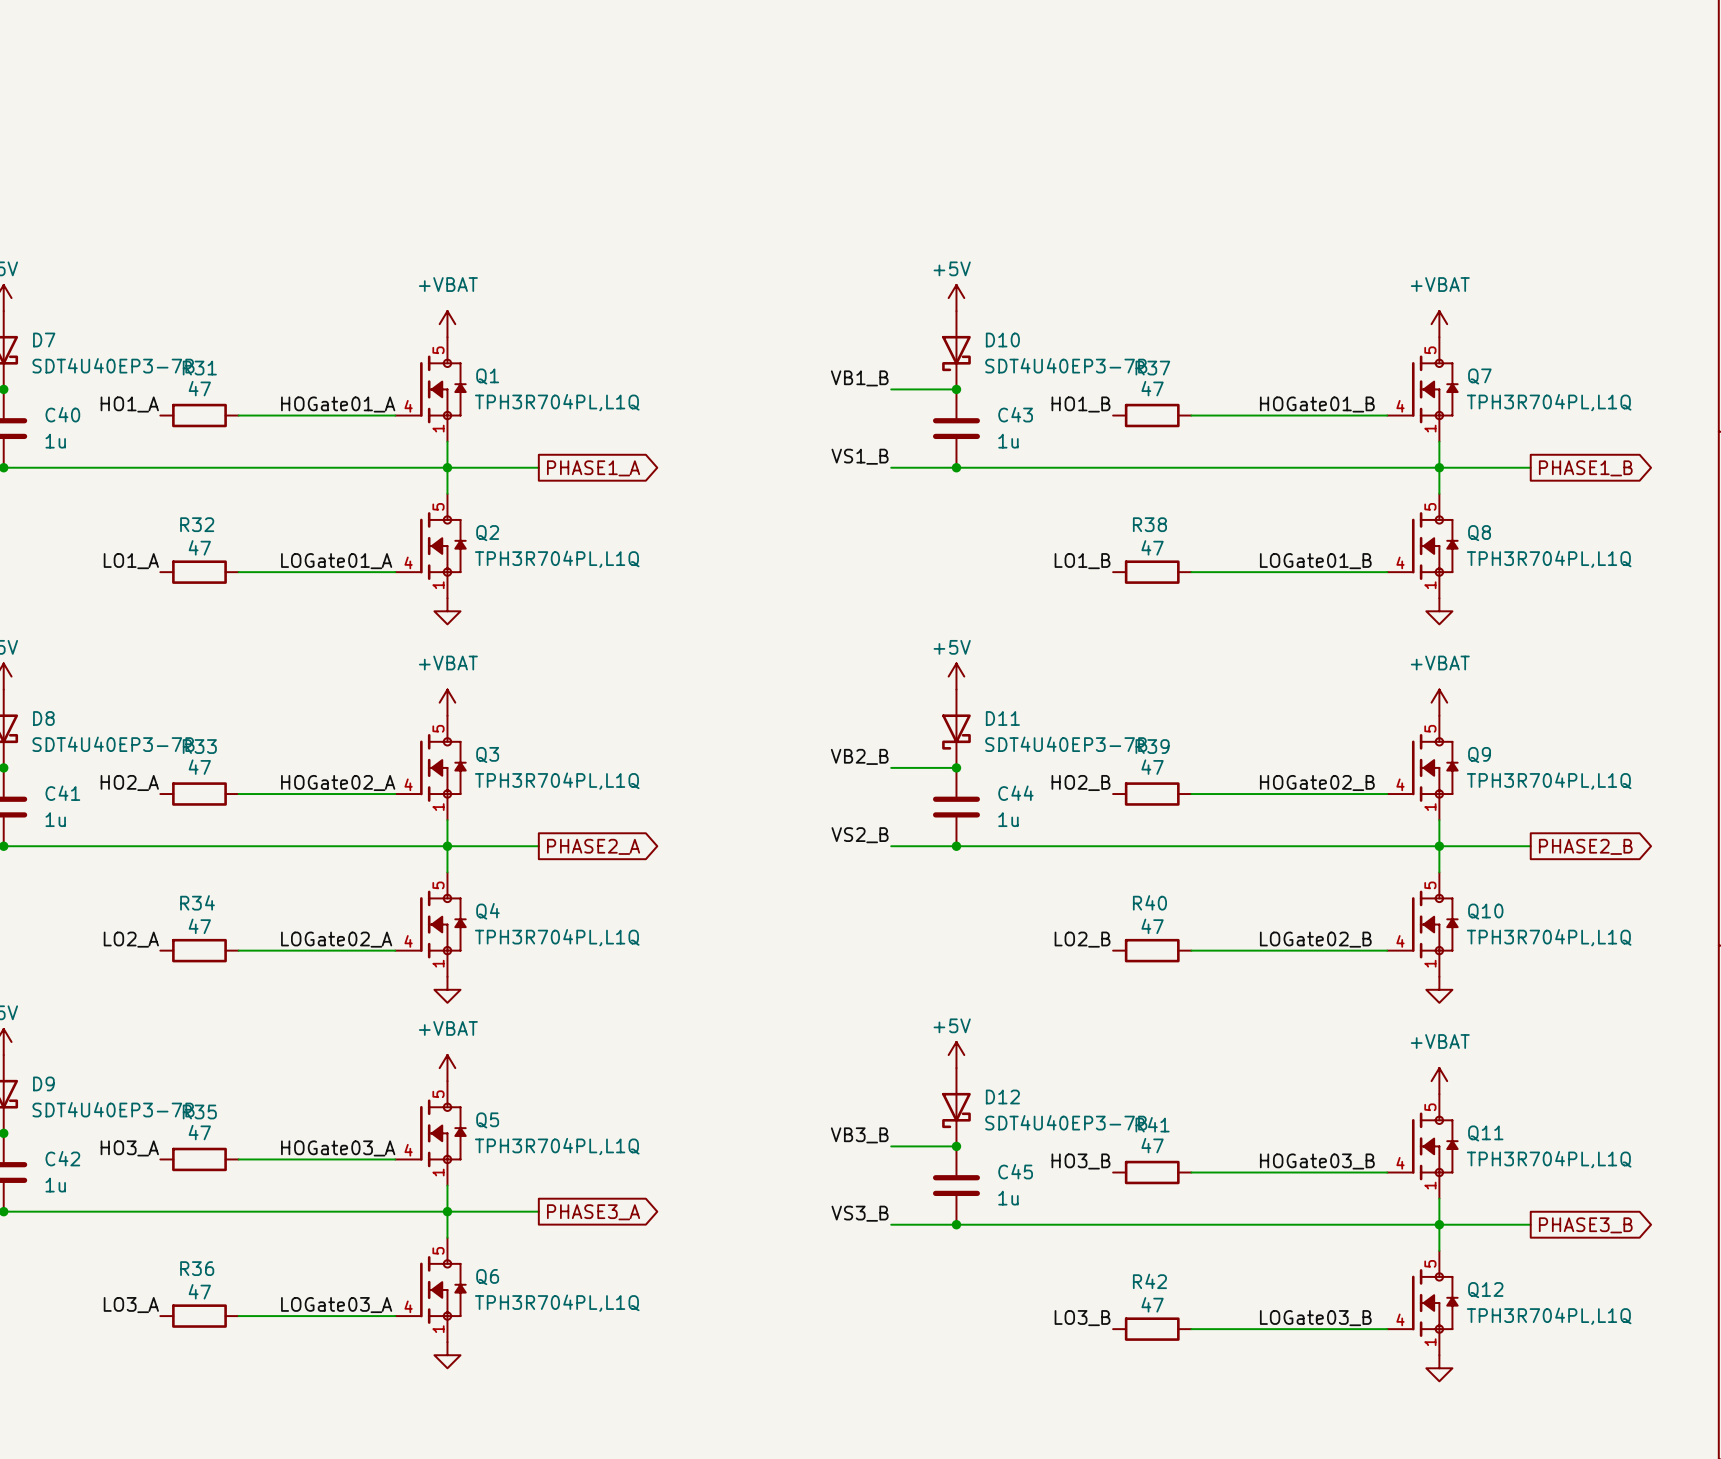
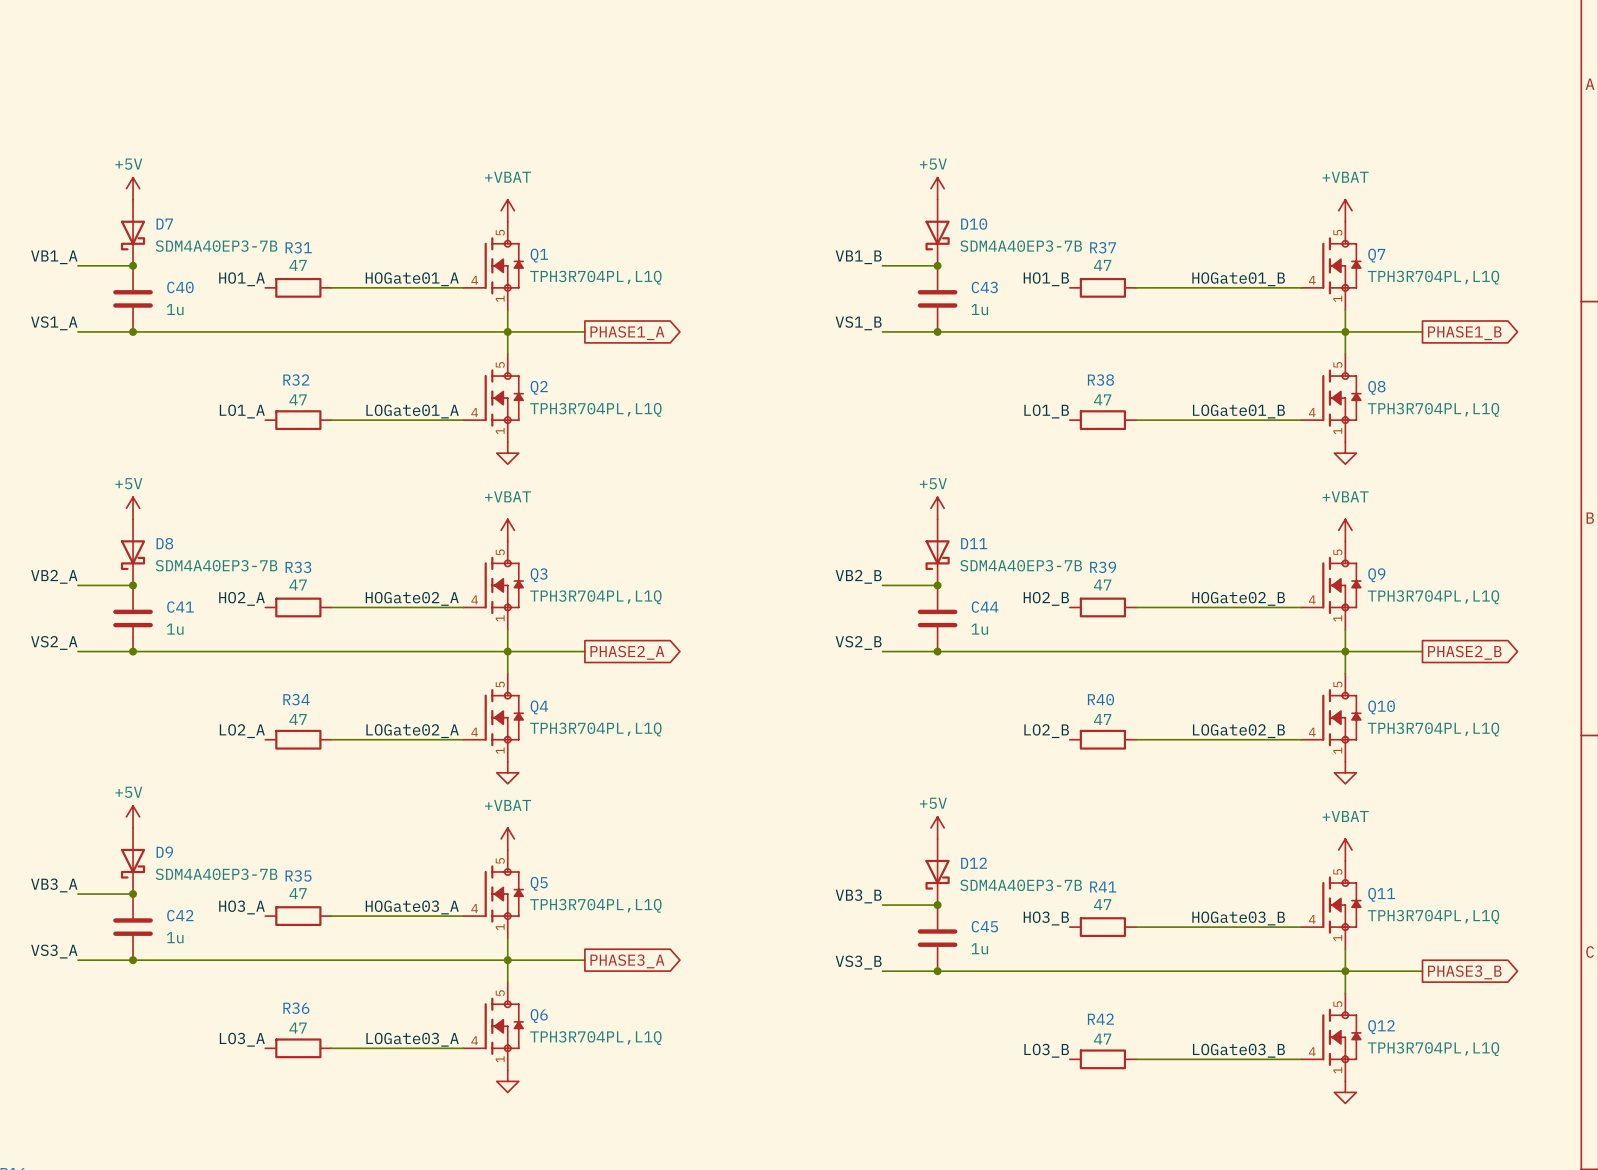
D7 value: SDT4U40EP3-7B (113, 365) -> SDM4A40EP3-7B (216, 246)
D10 value: SDT4U40EP3-7B (1066, 365) -> SDM4A40EP3-7B (1021, 246)
D8 value: SDT4U40EP3-7B (113, 744) -> SDM4A40EP3-7B (216, 565)
D11 value: SDT4U40EP3-7B (1066, 744) -> SDM4A40EP3-7B (1021, 565)
D9 value: SDT4U40EP3-7B (113, 1109) -> SDM4A40EP3-7B (216, 874)
D12 value: SDT4U40EP3-7B (1066, 1122) -> SDM4A40EP3-7B (1021, 885)

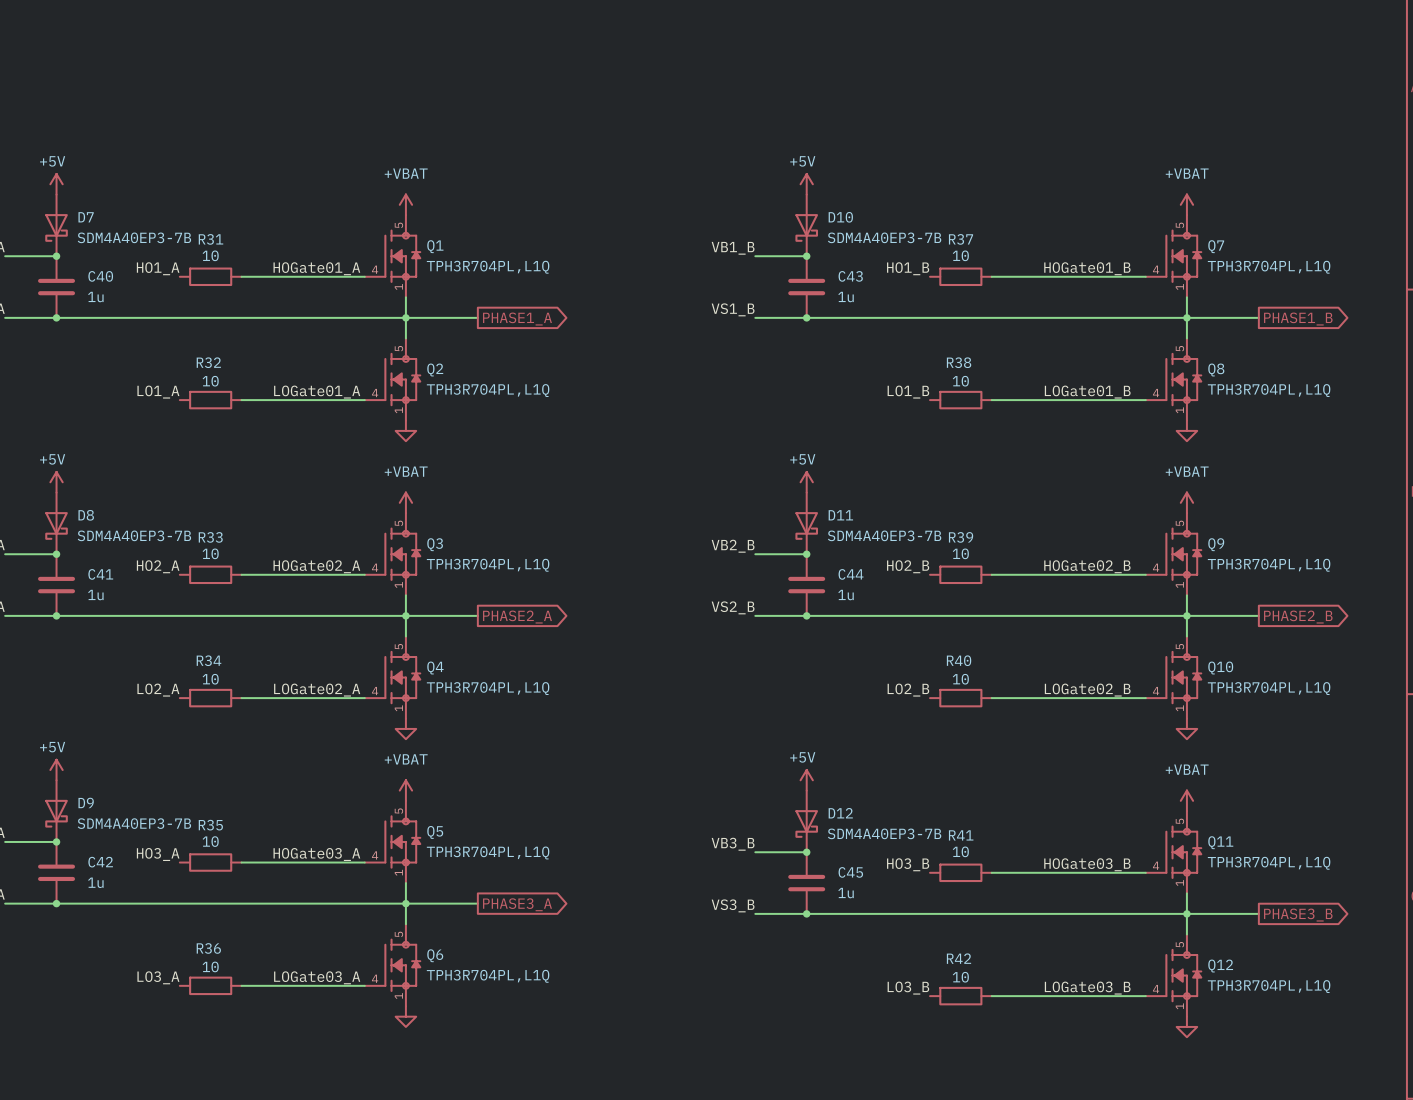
R31 value: 47 (298, 265) -> 10 (210, 255)
R37 value: 47 (1102, 265) -> 10 (960, 255)
R32 value: 47 (298, 399) -> 10 (210, 381)
R38 value: 47 (1102, 399) -> 10 (960, 381)
R33 value: 47 (298, 585) -> 10 (210, 553)
R39 value: 47 (1102, 585) -> 10 (960, 553)
R34 value: 47 (298, 719) -> 10 (210, 679)
R40 value: 47 (1102, 719) -> 10 (960, 679)
R35 value: 47 (298, 893) -> 10 (210, 841)
R41 value: 47 (1102, 904) -> 10 (960, 851)
R36 value: 47 (298, 1028) -> 10 (210, 966)
R42 value: 47 (1102, 1039) -> 10 (960, 977)

